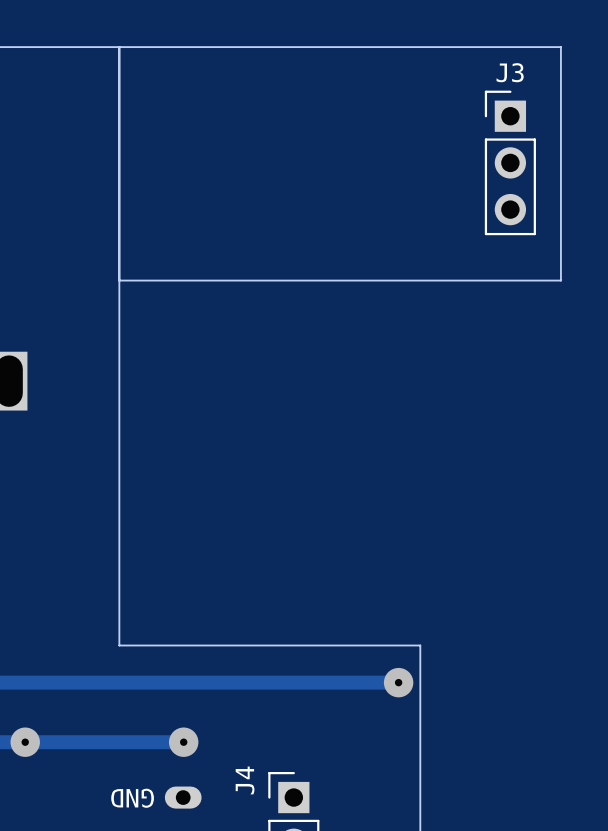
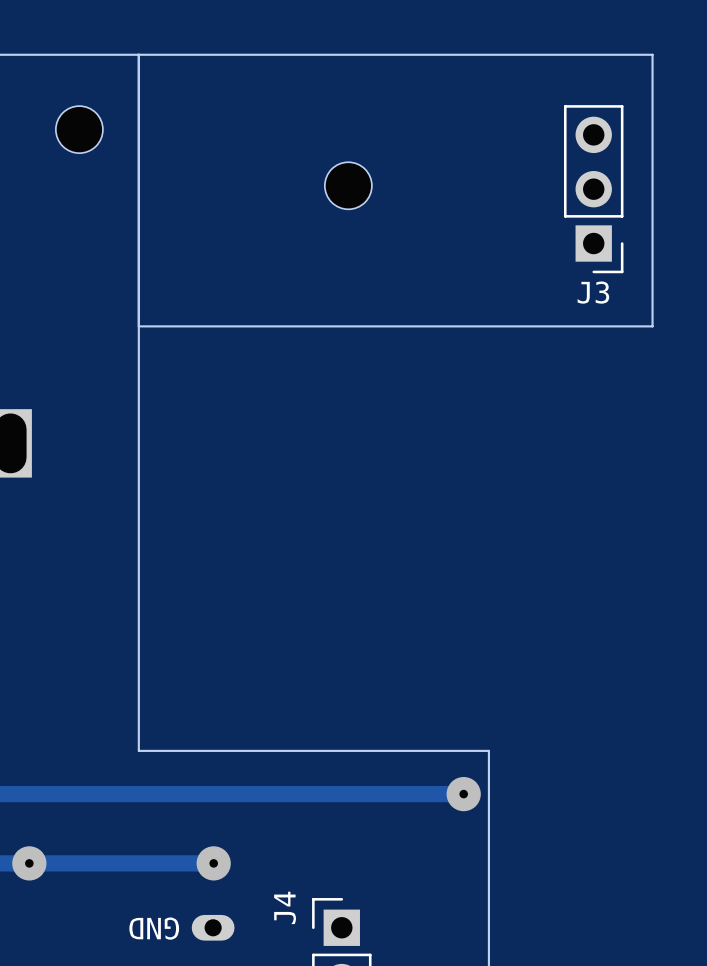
part: none -> (79, 129)
part: none -> (348, 185)
J3 rotation: 0° (510, 162) -> 180° (593, 189)

